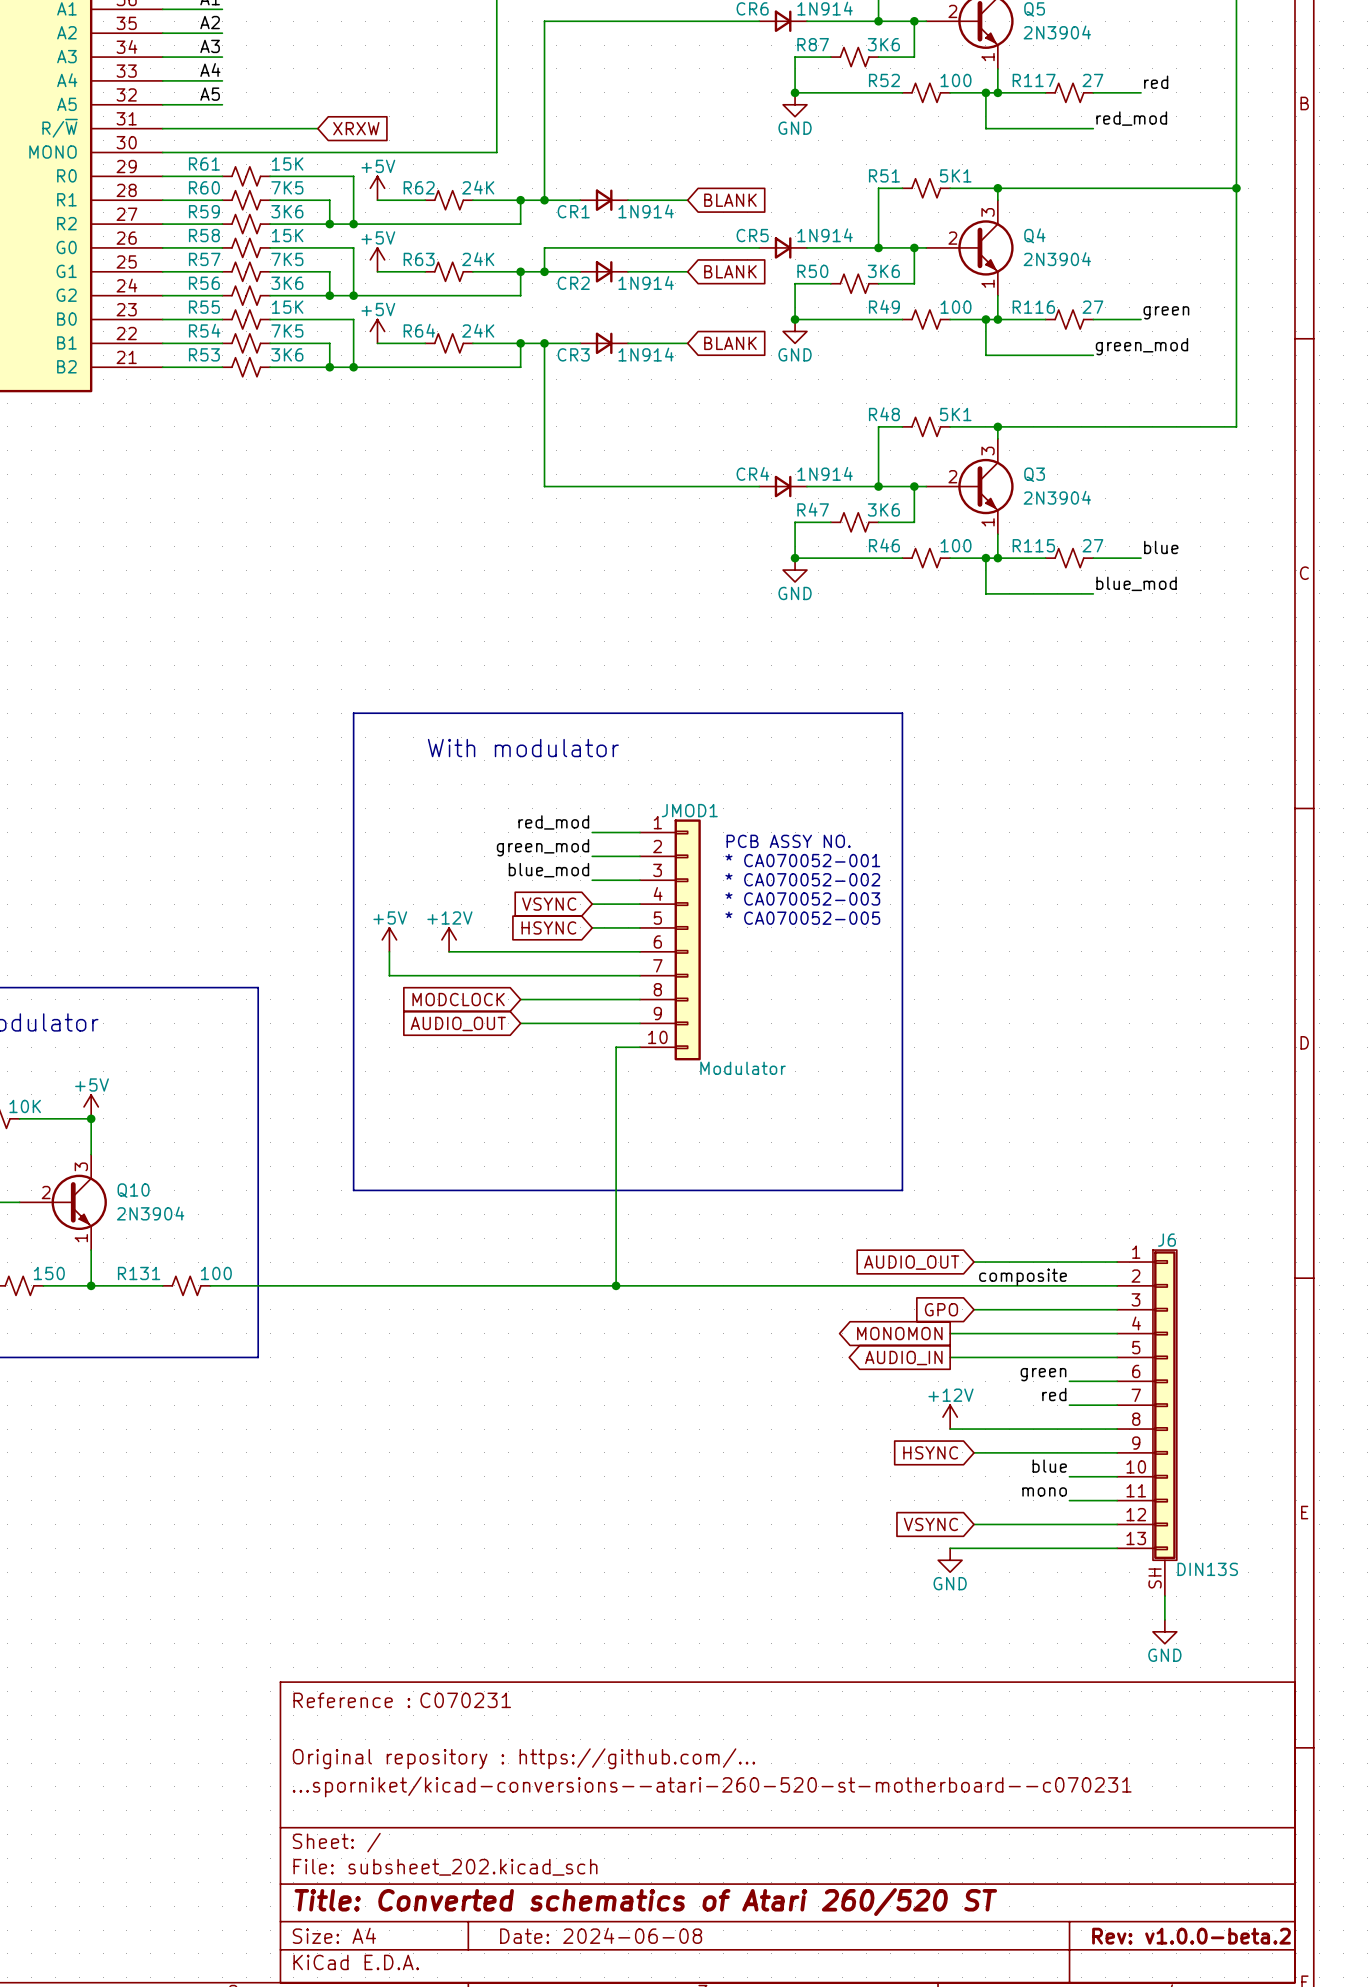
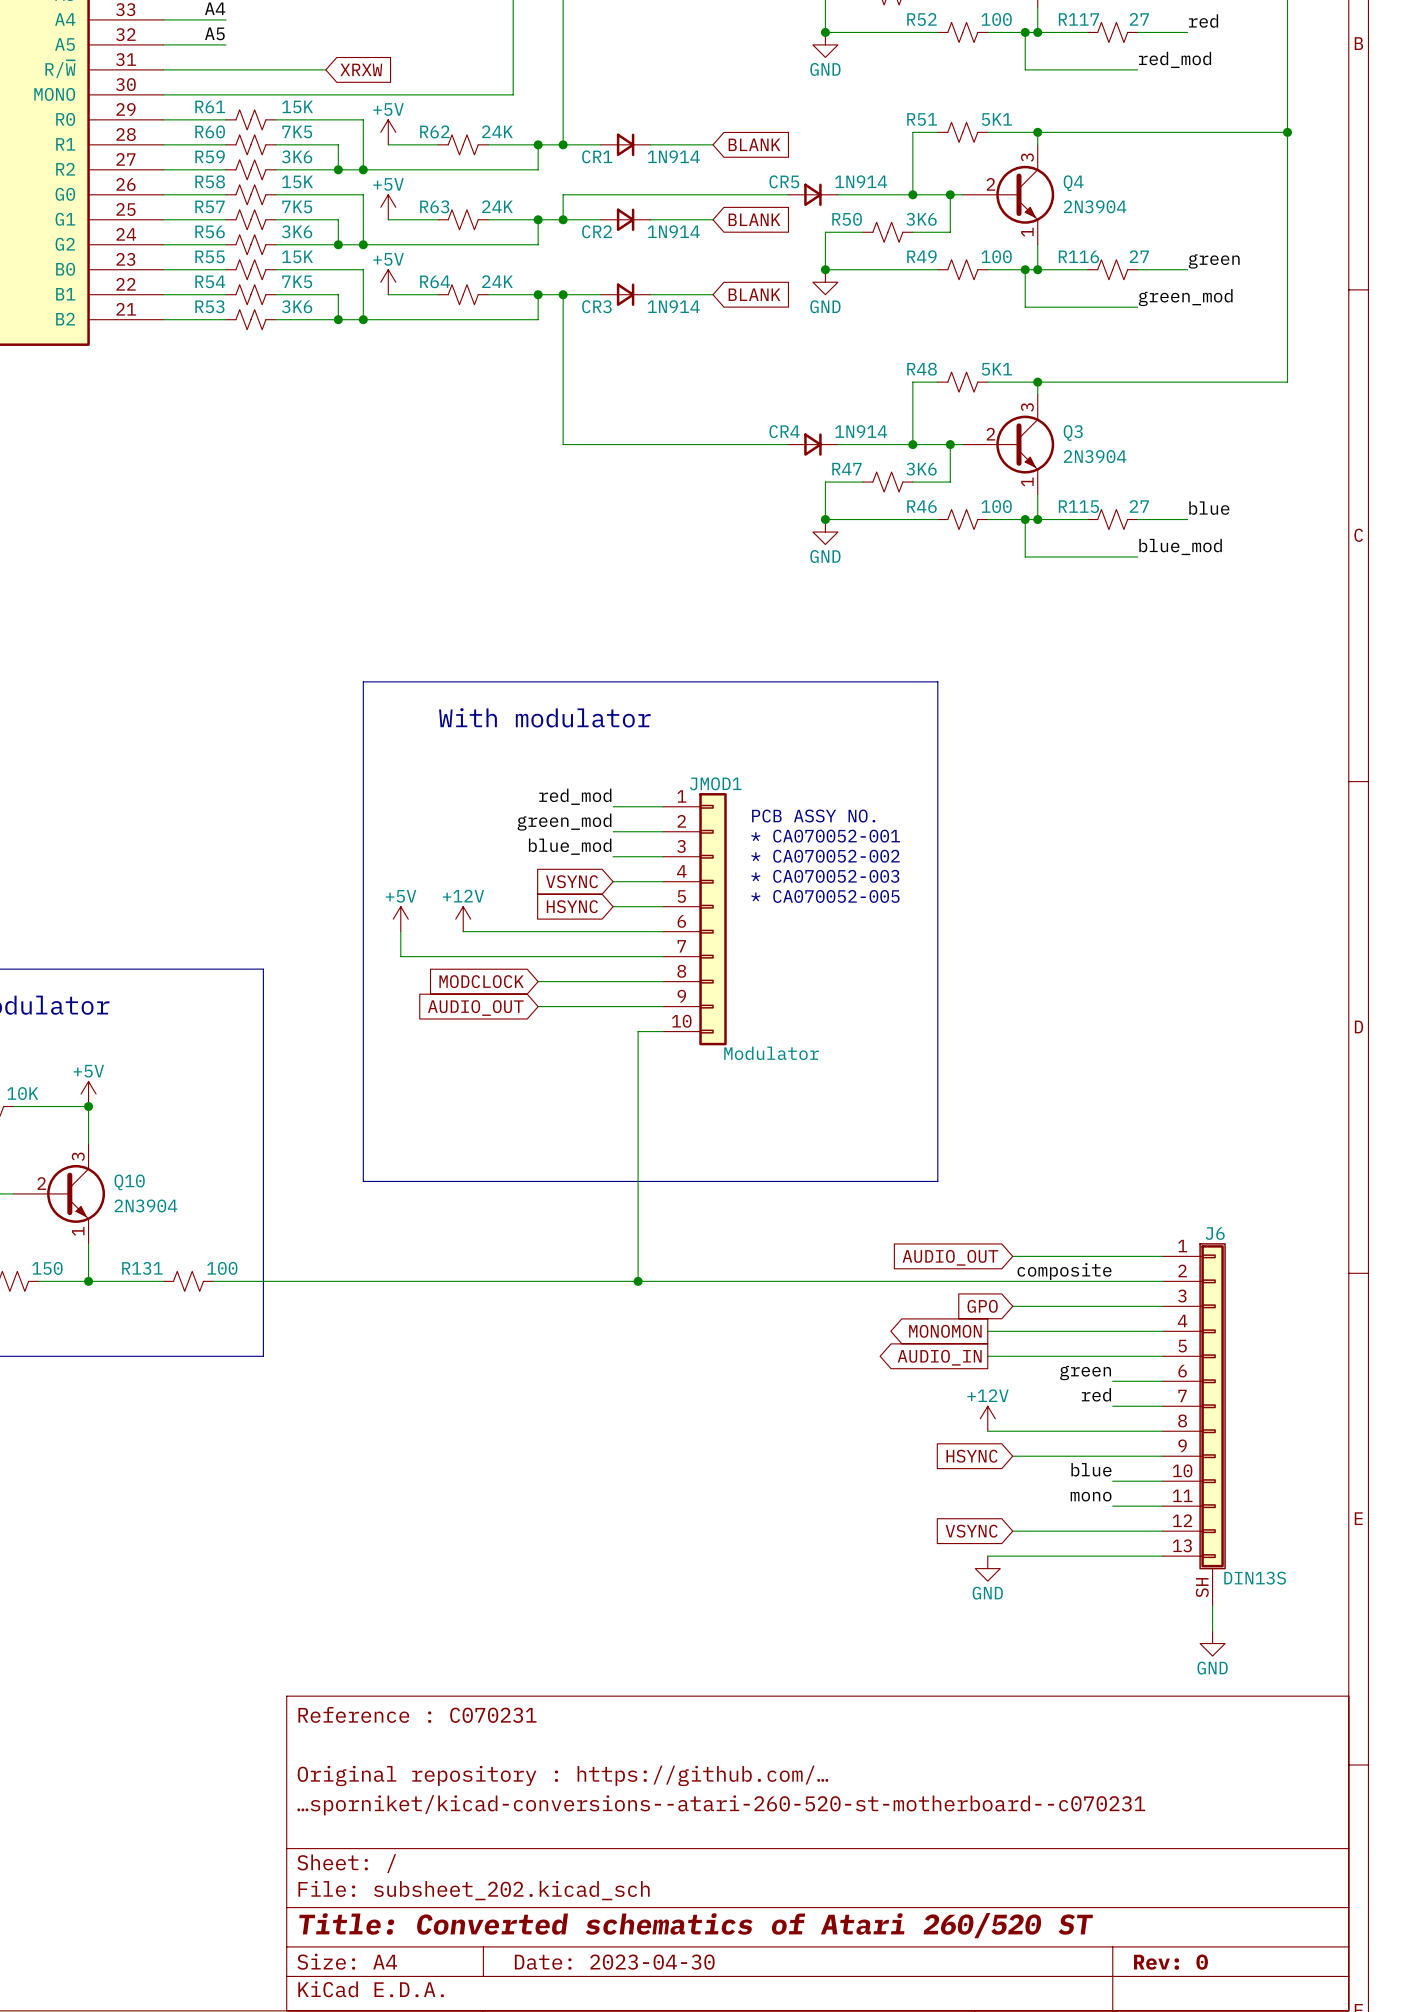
title block: Date: 2024-06-08 (601, 1935) -> Date: 2023-04-30 (614, 1962)
title block: Rev: v1.0.0-beta.2 (1191, 1936) -> Rev: 0 (1170, 1962)

